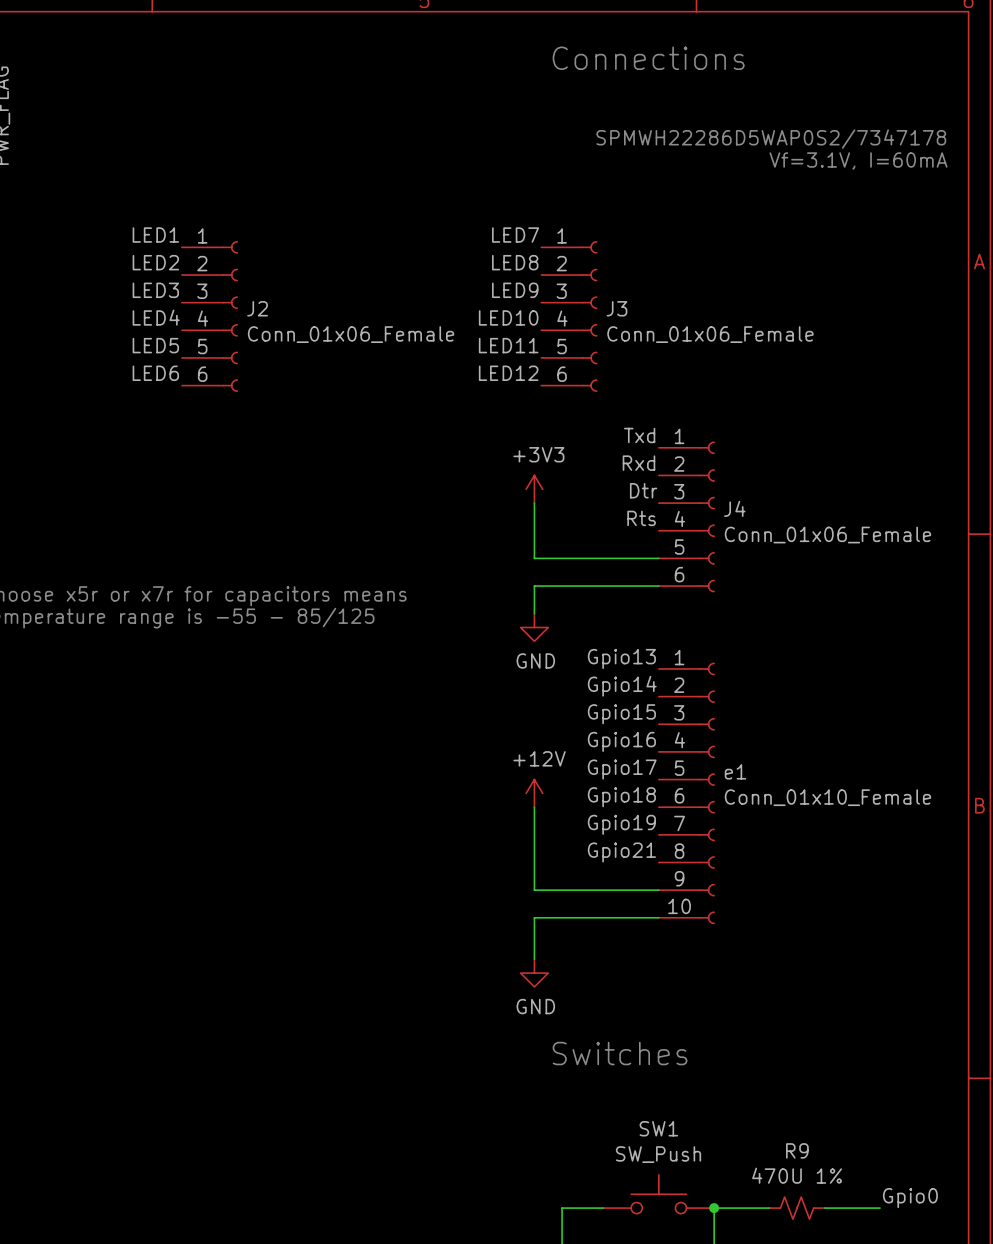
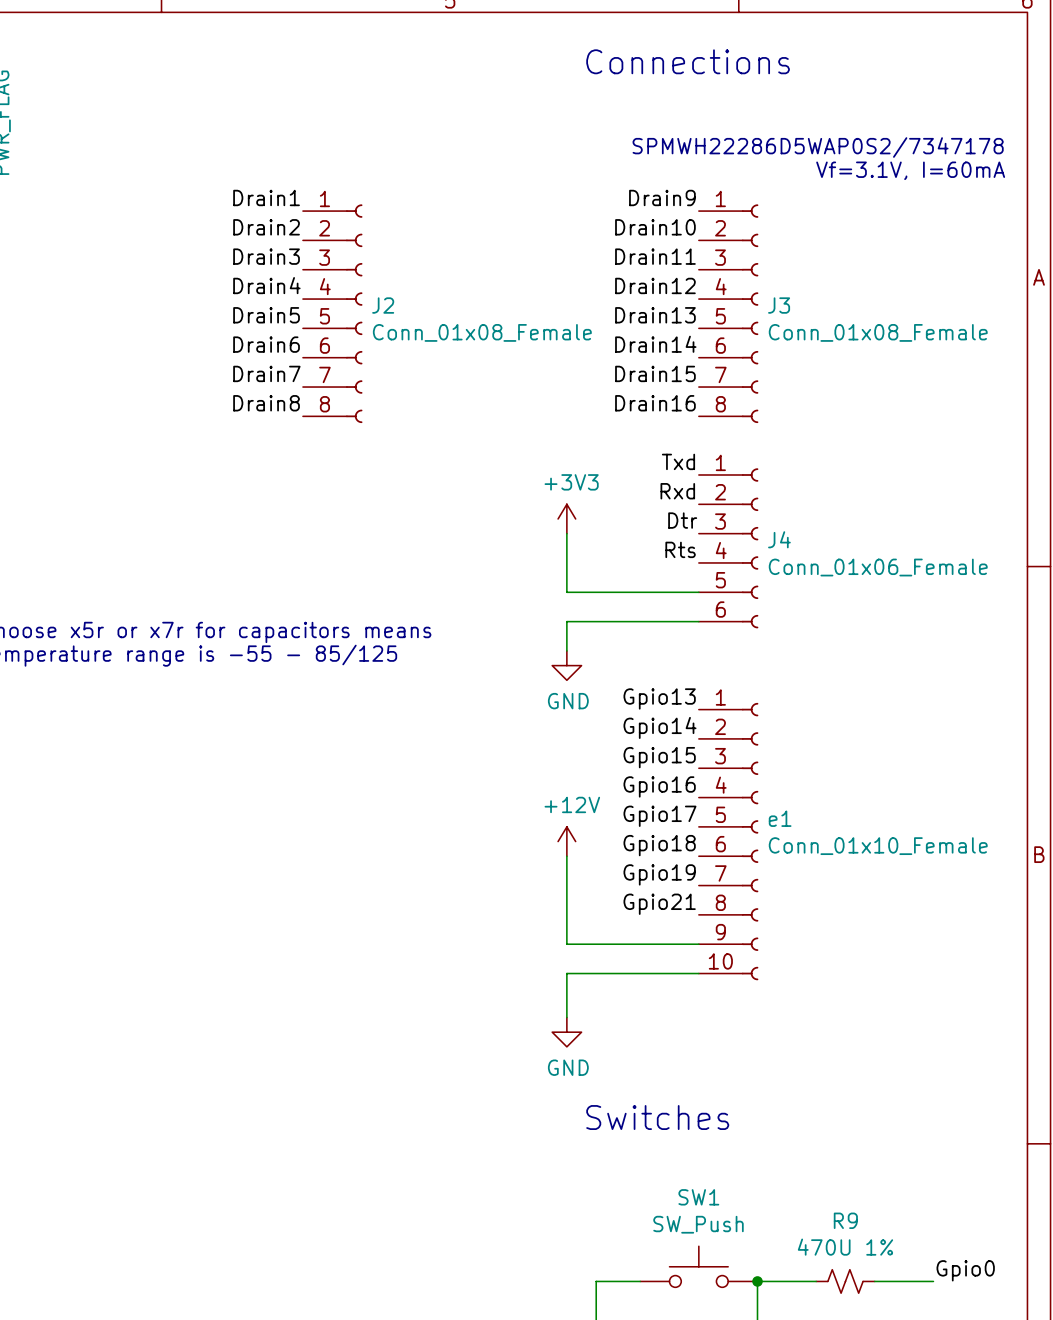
label: none -> Drain1 (266, 197)
label: none -> Drain9 (662, 197)
label: none -> Drain2 (266, 227)
label: none -> Drain10 (655, 227)
label: LED1 (155, 235) -> none
label: LED7 (515, 235) -> none
J2 symbol: [181, 241, 239, 392] -> [302, 204, 363, 424]
label: none -> Drain3 (266, 256)
J3 symbol: [541, 241, 598, 392] -> [698, 204, 759, 424]
label: none -> Drain11 (655, 256)
label: LED2 (155, 262) -> none
label: LED8 (515, 262) -> none
label: none -> Drain4 (266, 285)
label: none -> Drain12 (655, 285)
label: LED3 (155, 290) -> none
label: LED9 (515, 290) -> none
label: none -> Drain5 (266, 315)
label: none -> Drain13 (655, 315)
label: LED4 (156, 317) -> none
label: LED10 (508, 317) -> none
label: none -> Drain6 (266, 344)
label: none -> Drain14 (655, 344)
J2 value: Conn_01x06_Female (351, 334) -> Conn_01x08_Female (482, 332)
J3 value: Conn_01x06_Female (710, 334) -> Conn_01x08_Female (878, 332)
label: LED5 (155, 345) -> none
label: LED11 (508, 345) -> none
label: none -> Drain7 (266, 373)
label: none -> Drain15 (655, 373)
label: LED6 (155, 373) -> none
label: LED12 (508, 373) -> none
label: none -> Drain8 (266, 403)
label: none -> Drain16 (655, 403)

